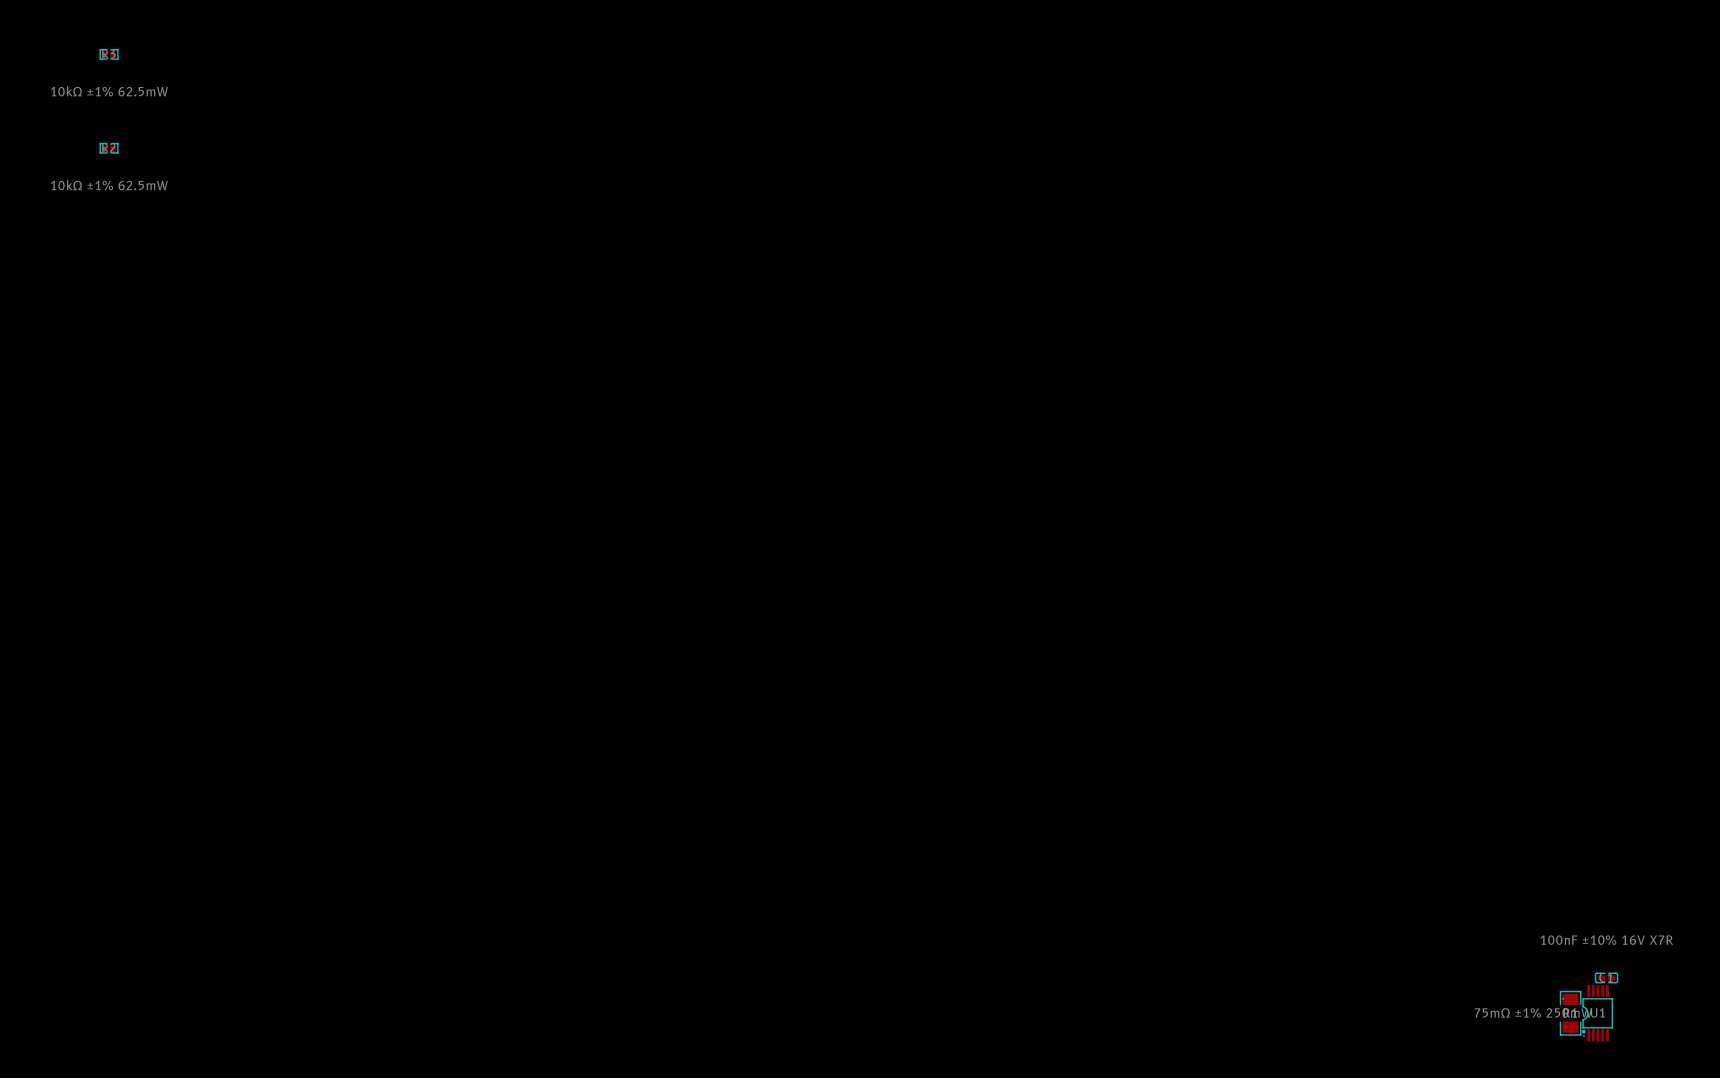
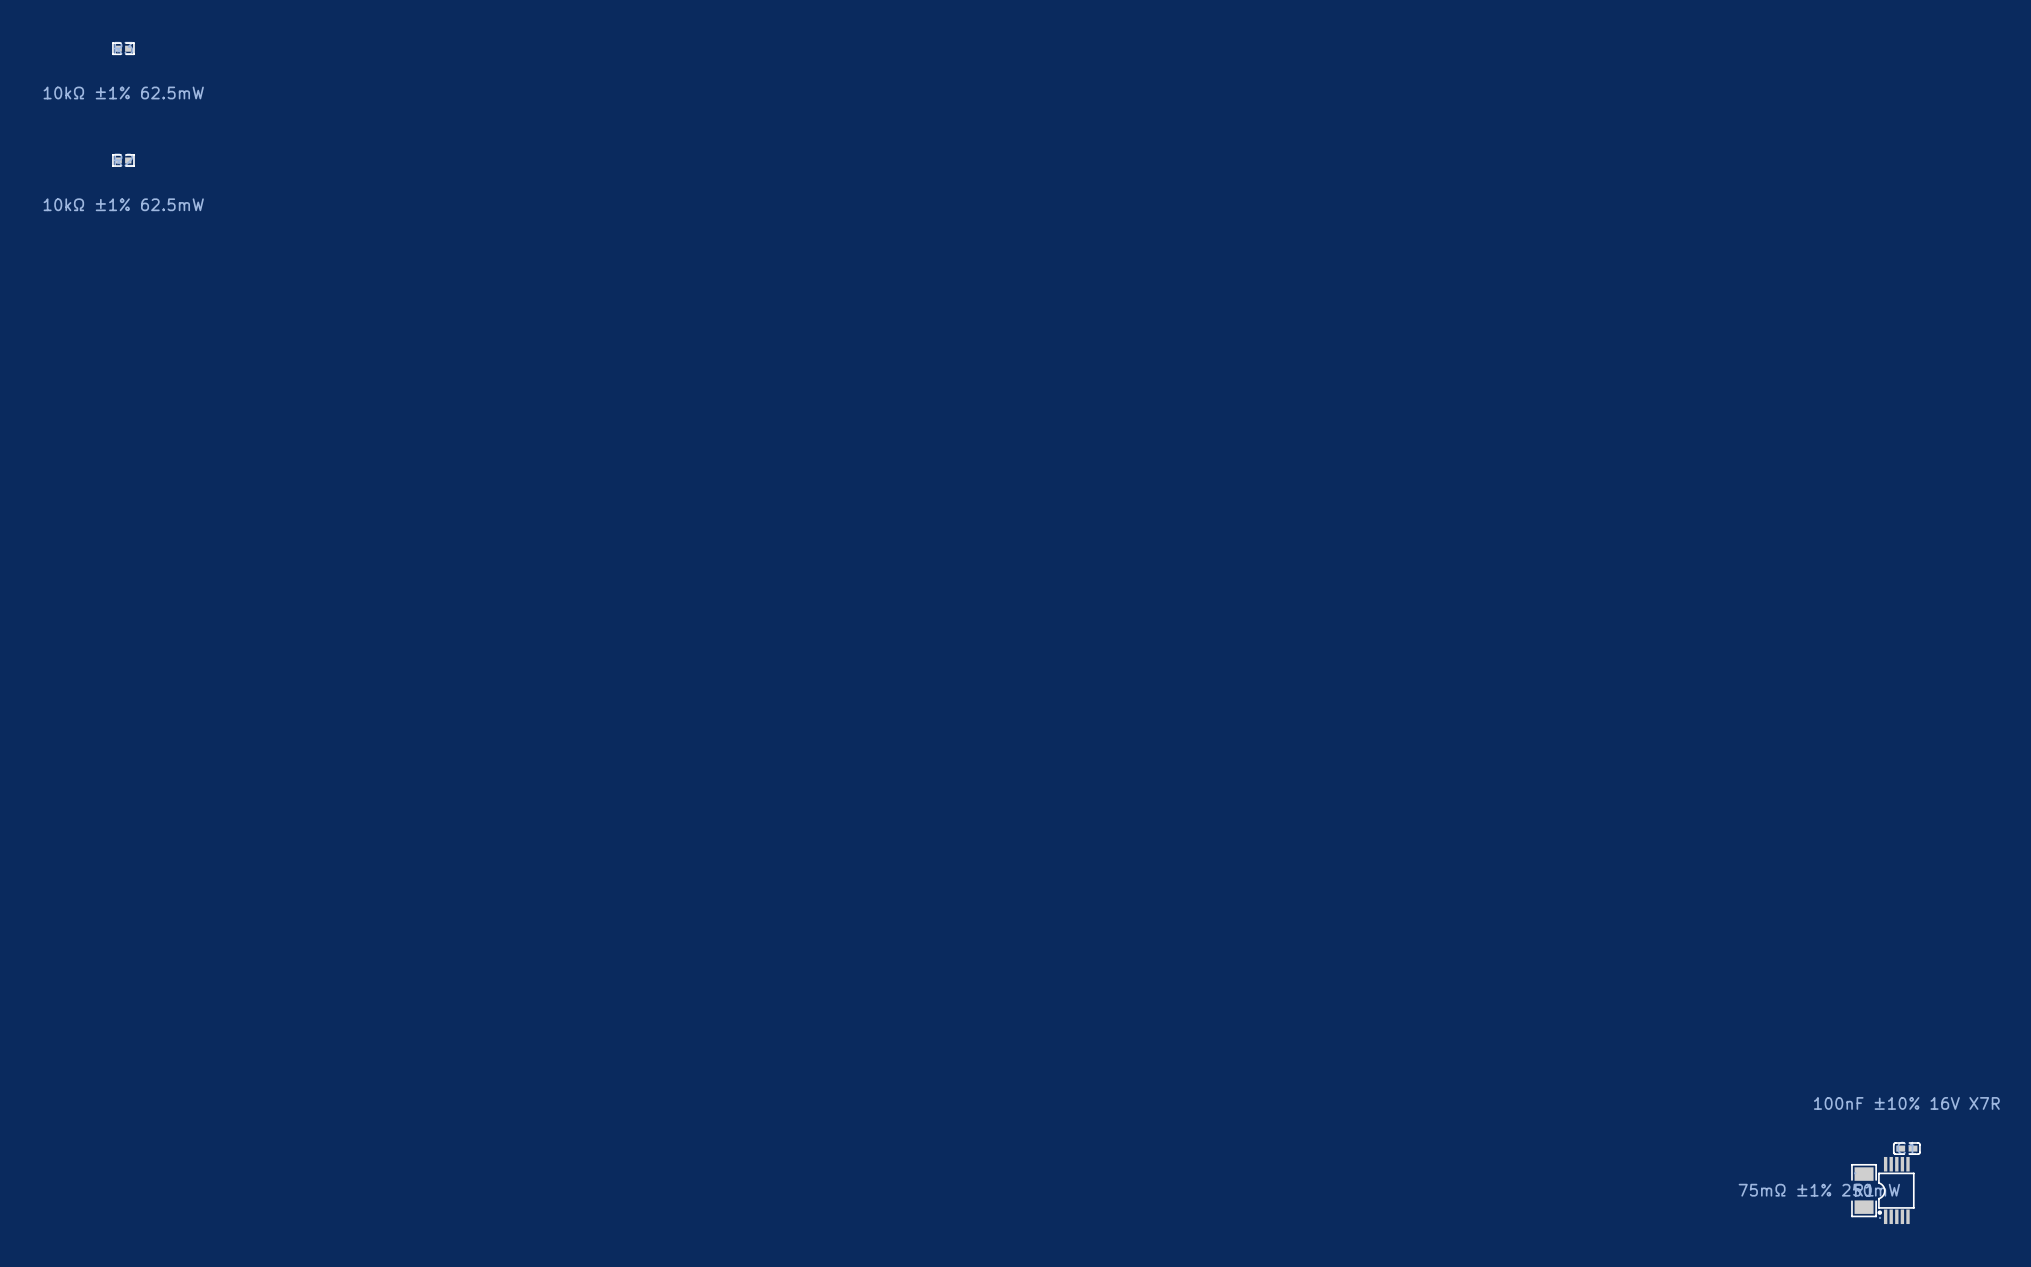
U1 name: U1 (1597, 1012) -> none

